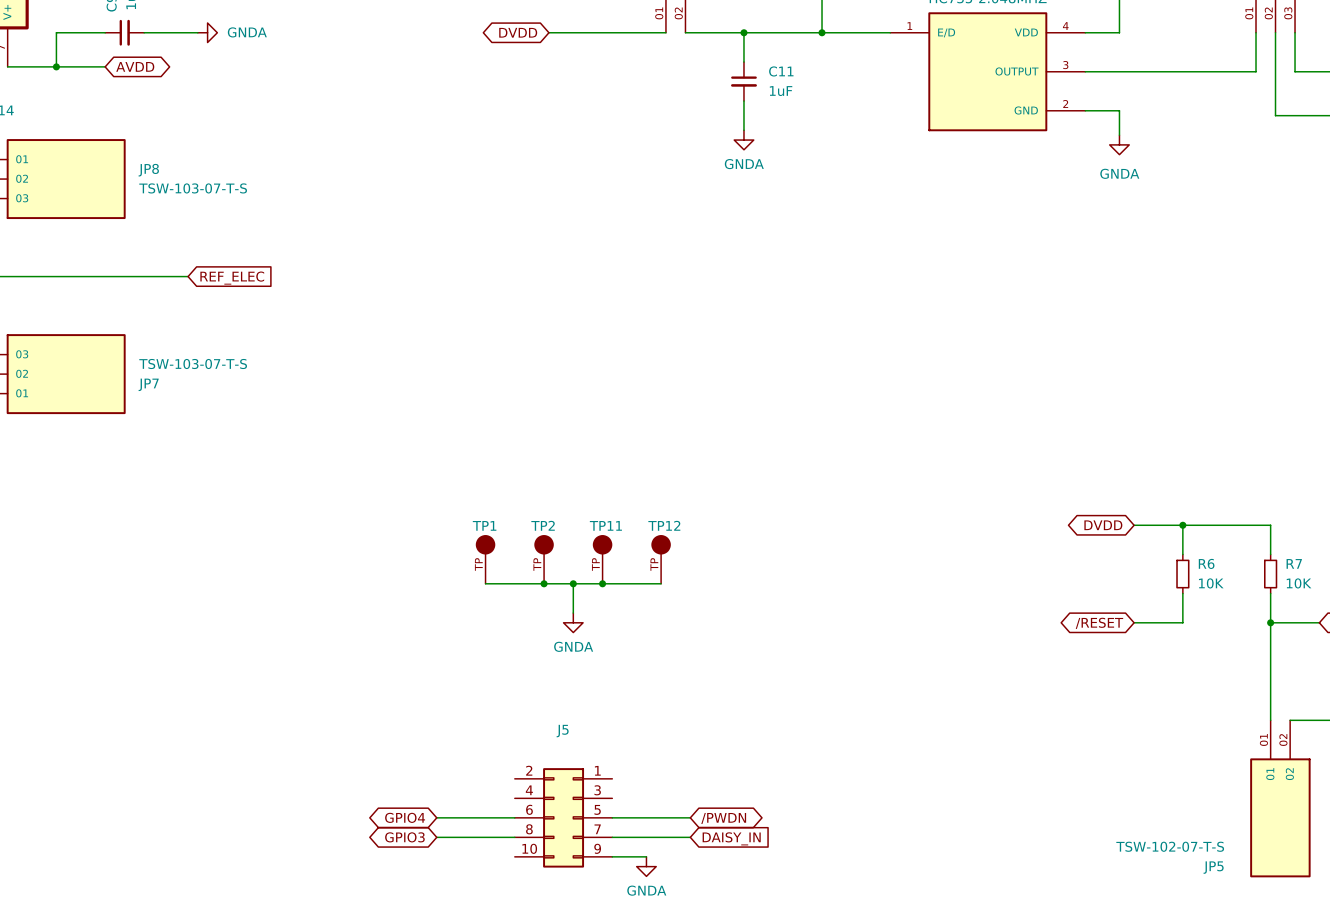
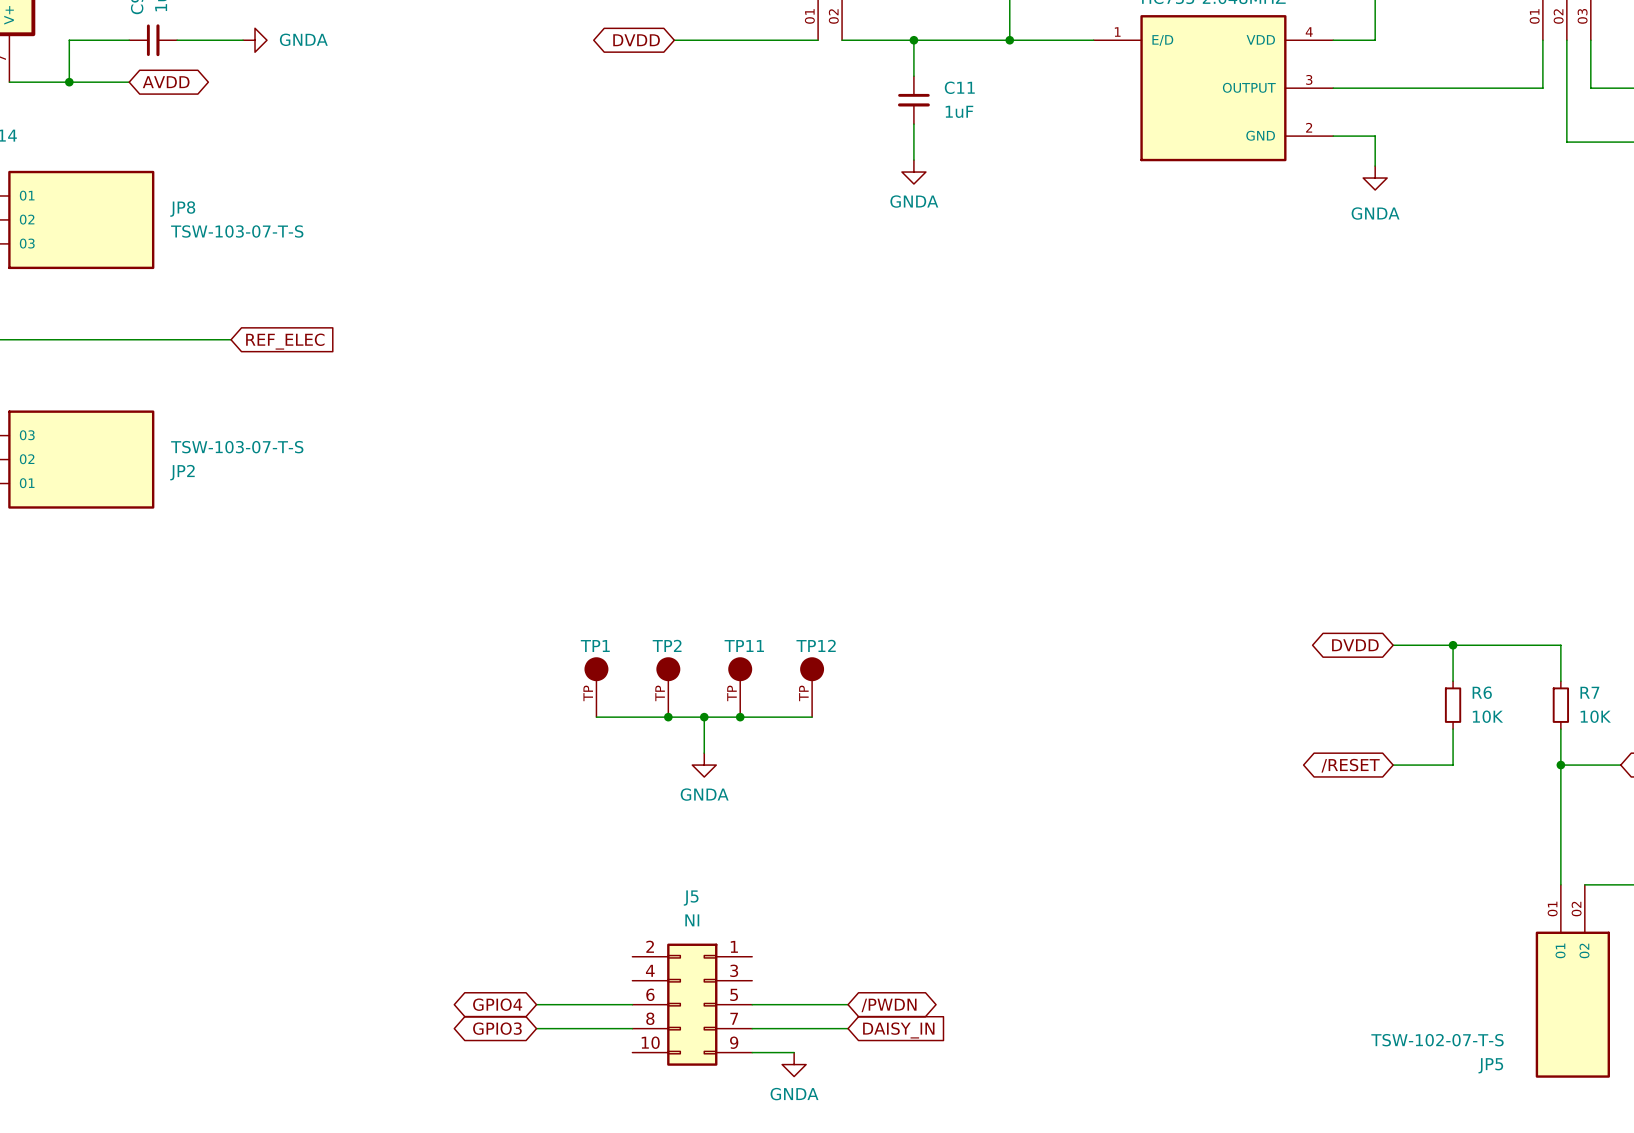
JP7 name: JP7 (148, 384) -> JP2 (182, 472)
J5 value: none -> NI (692, 920)

